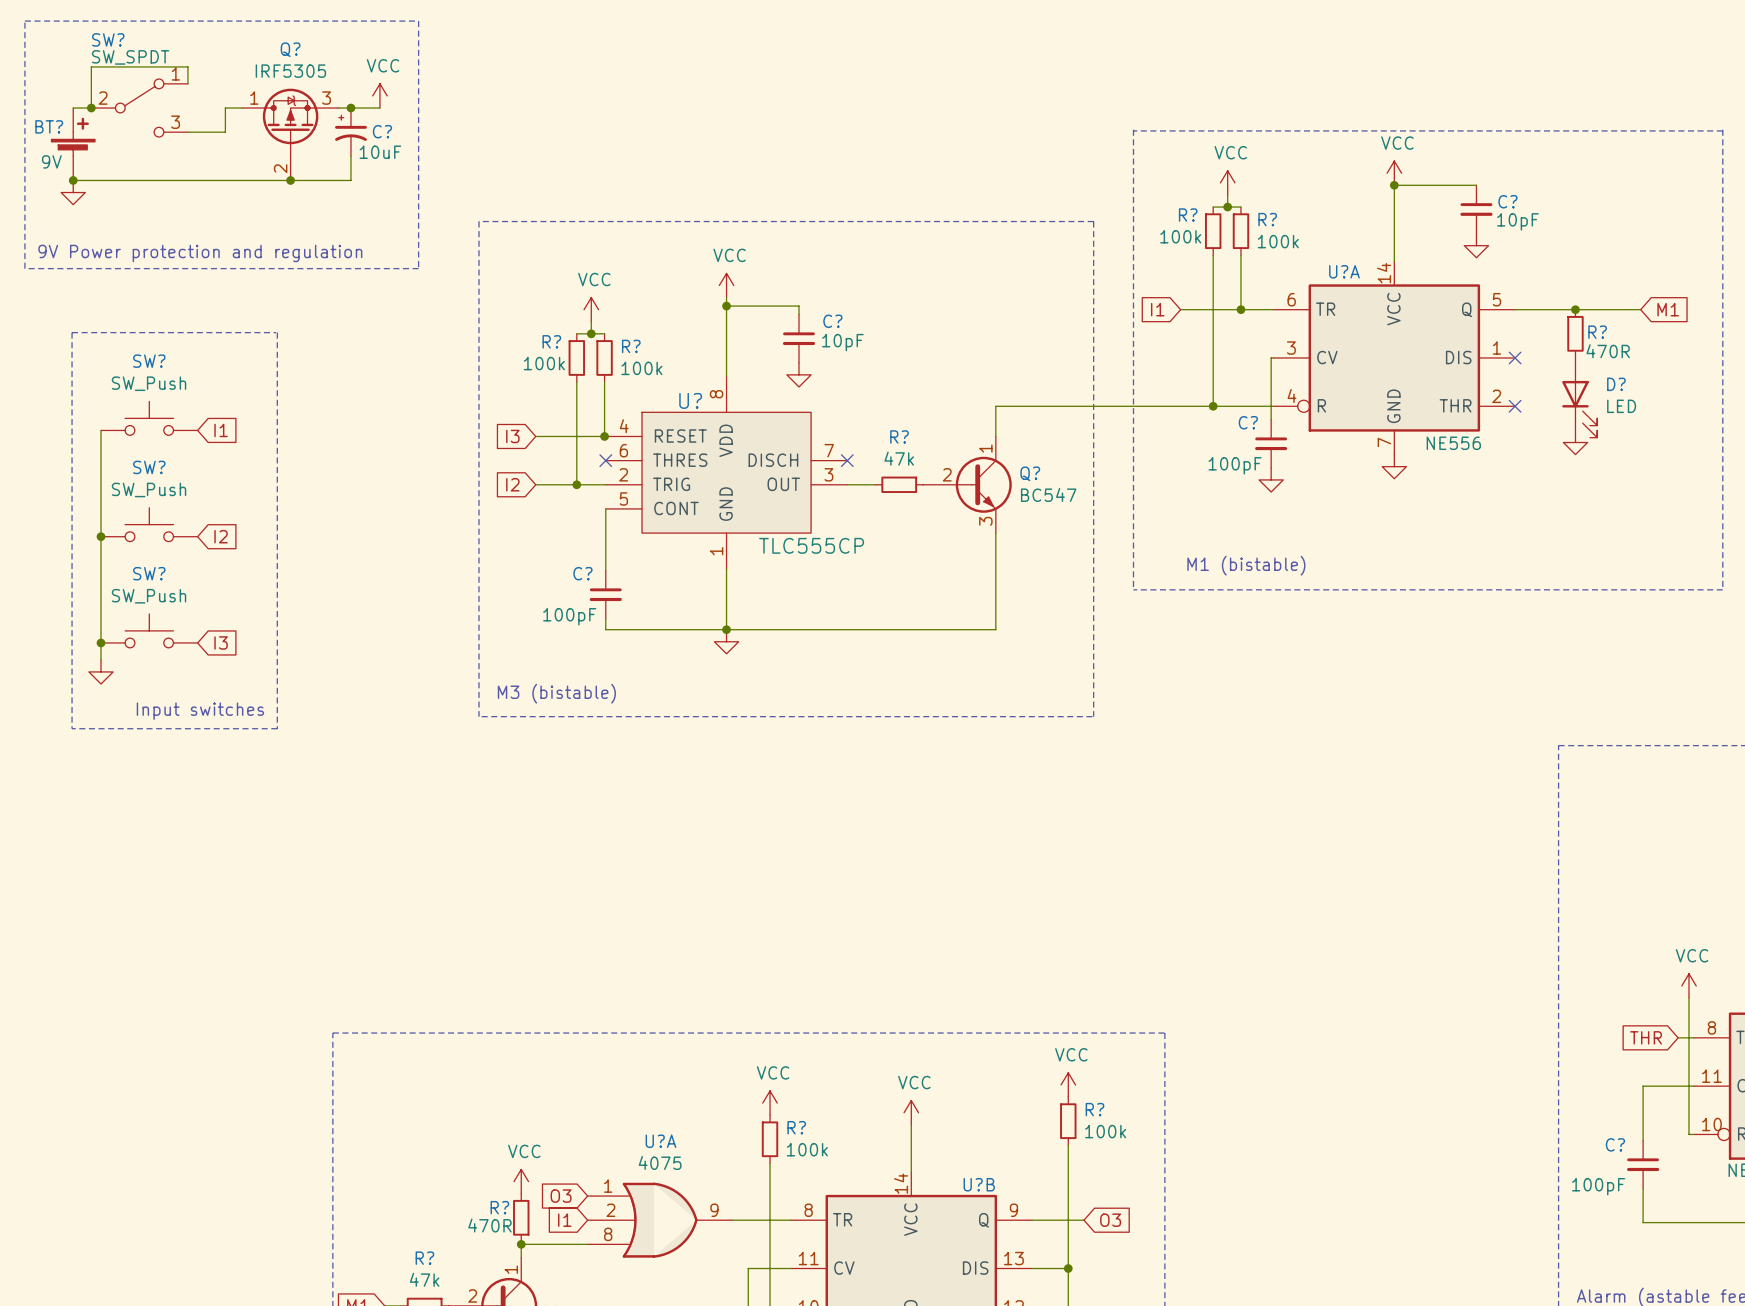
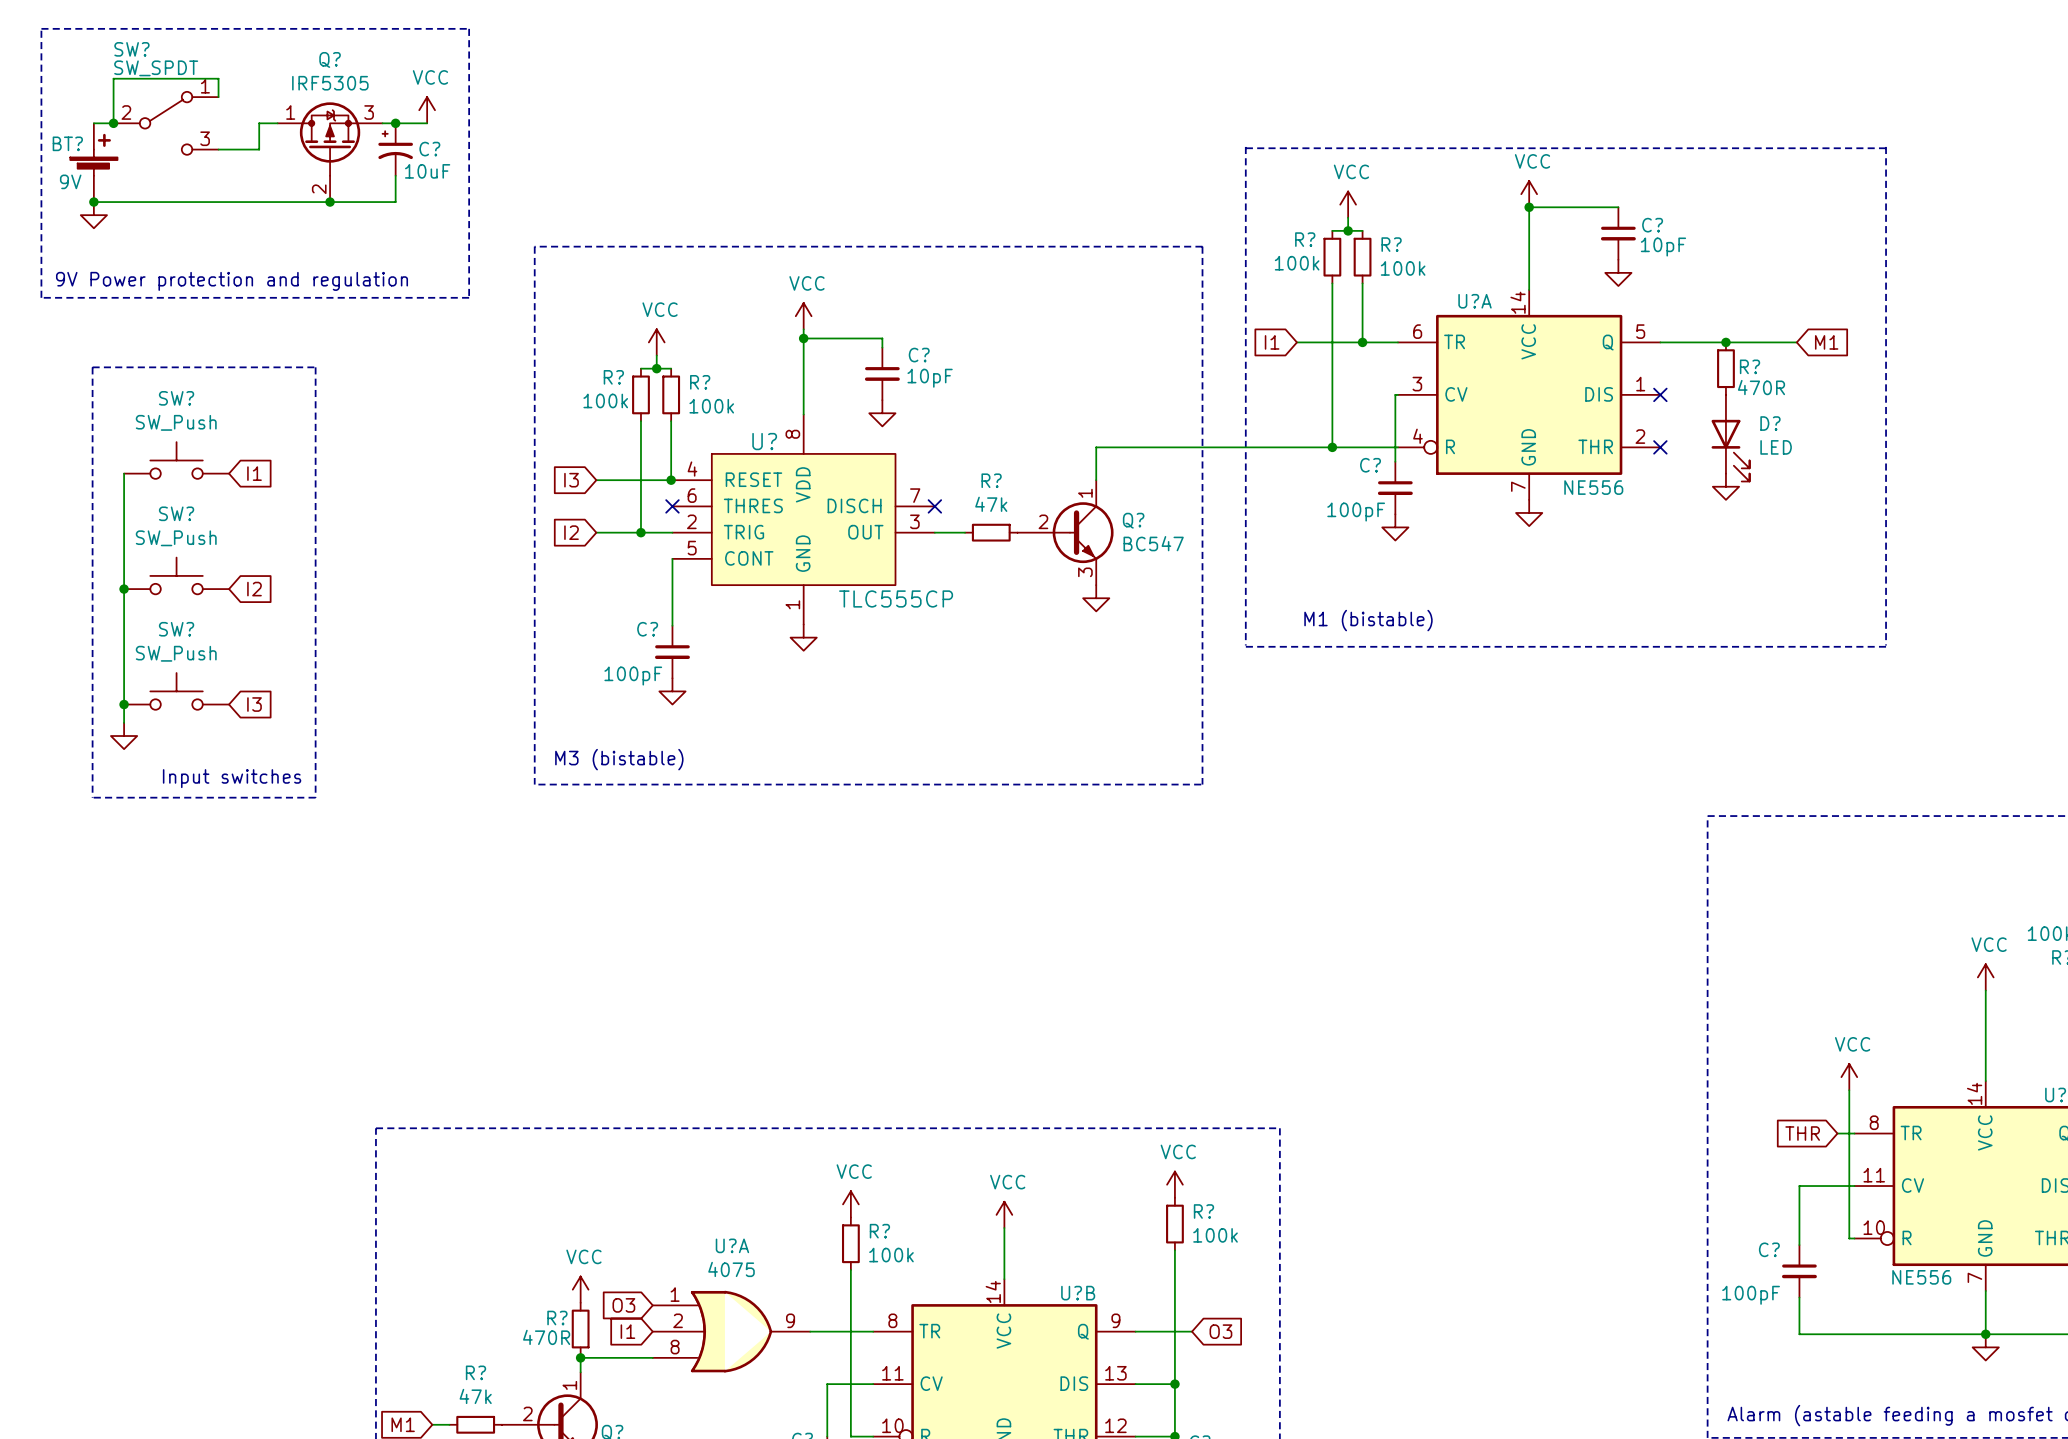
wire: (995, 533) (995, 629) (605, 629) (605, 618) -> none
power symbol: none -> (1096, 598)
wire: (726, 569) (726, 629) -> none
junction: (726, 629) -> none
power symbol: none -> (672, 691)
power symbol position: (726, 641) -> (803, 637)

